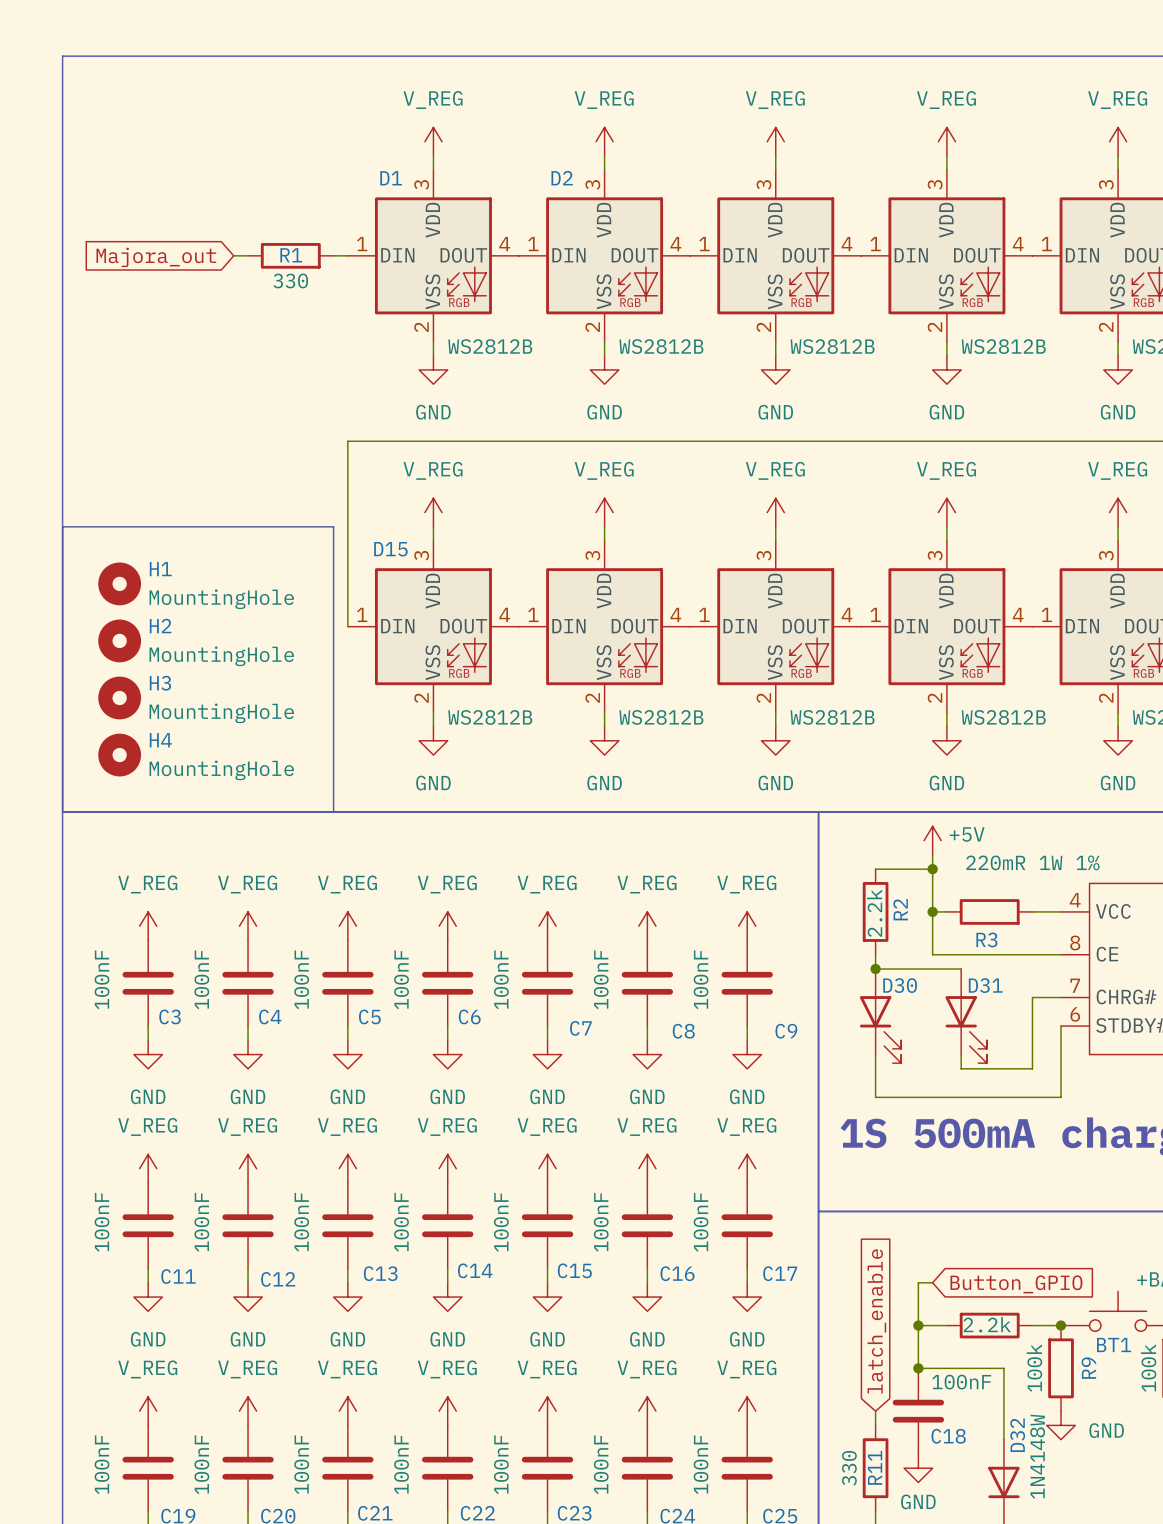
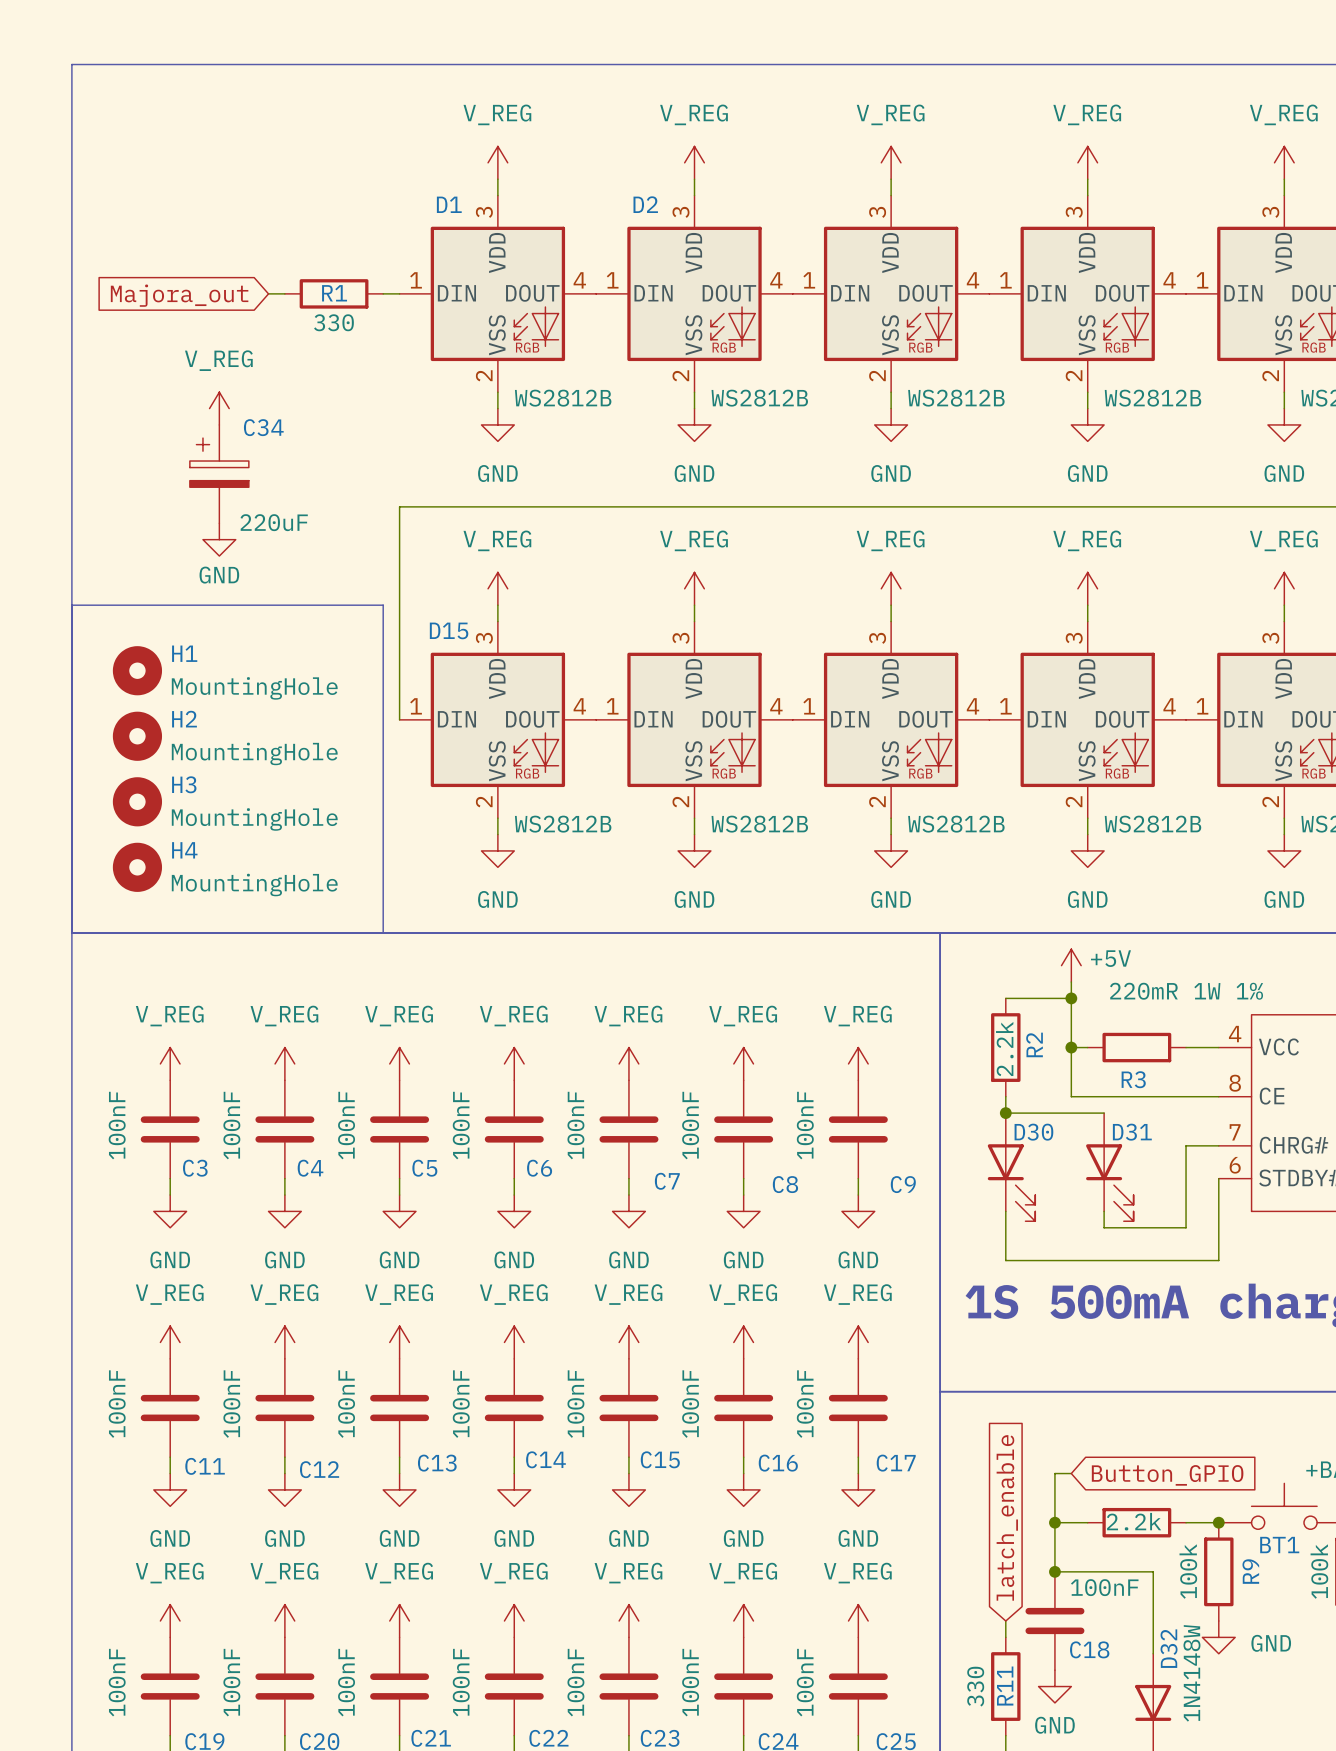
power symbol: none -> V_REG (219, 408)
C34: none -> 220uF (219, 474)
power symbol: none -> GND (219, 539)

